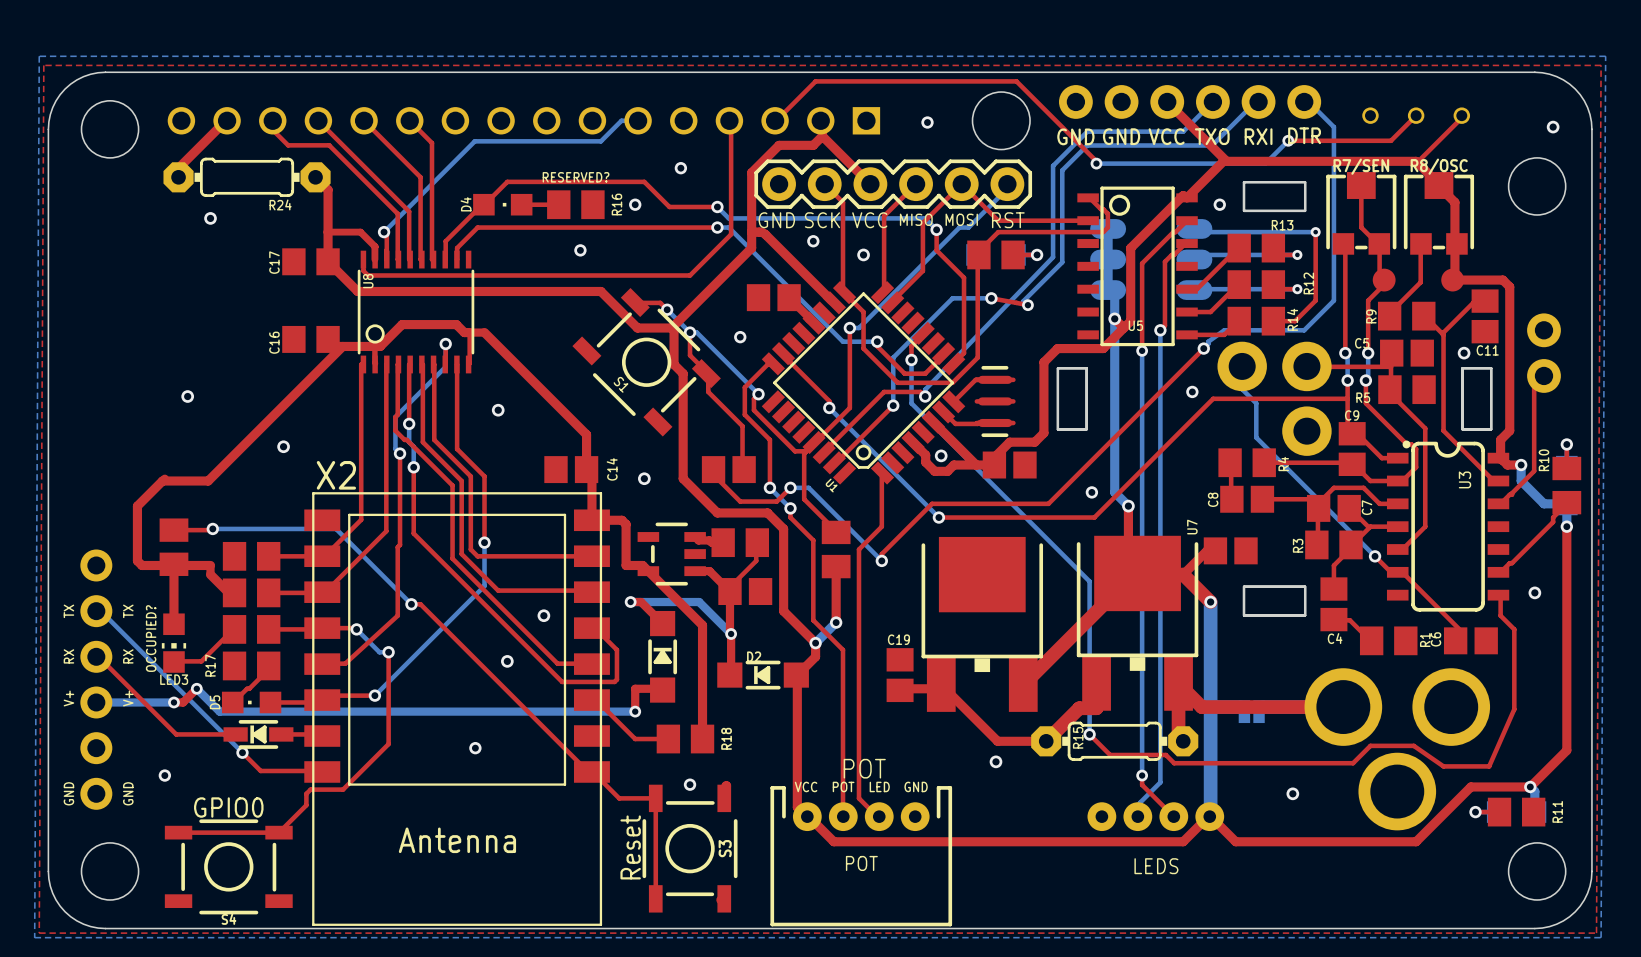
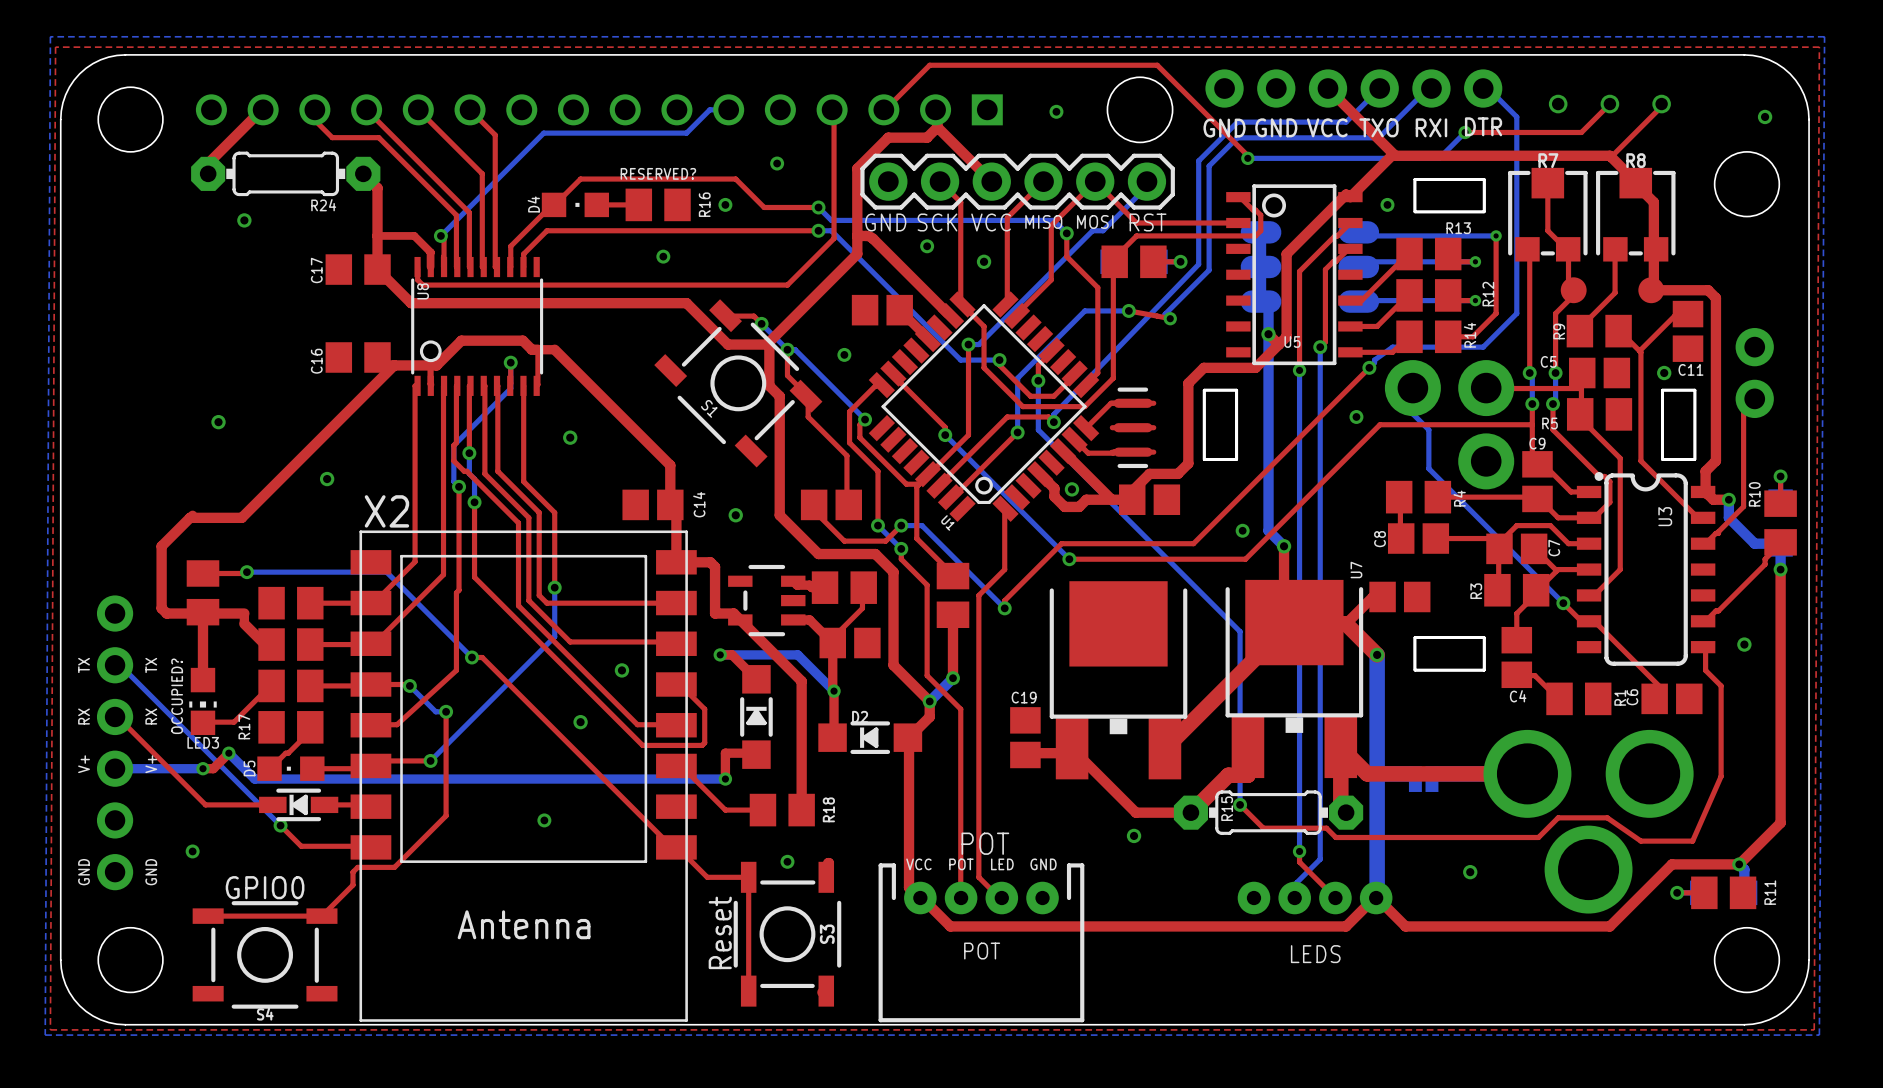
R7/SEN name: R7/SEN (1361, 166) -> R7 (1548, 160)
R8/OSC name: R8/OSC (1439, 166) -> R8 (1636, 160)

